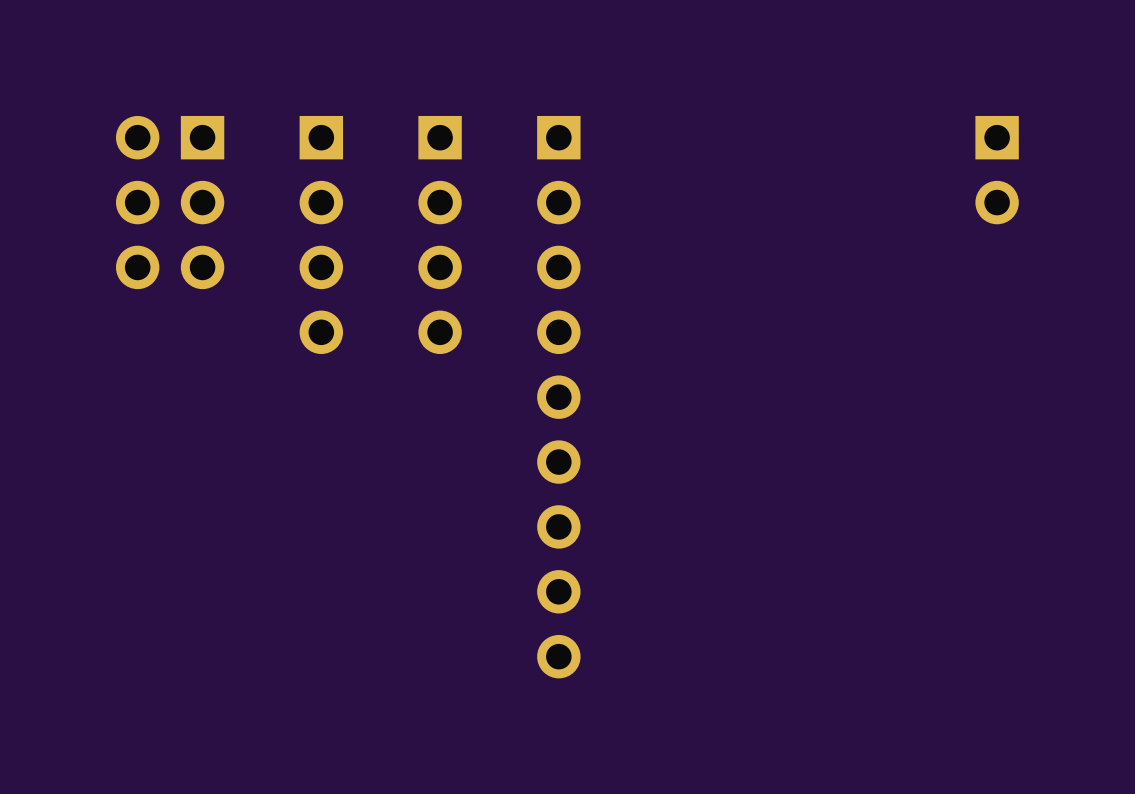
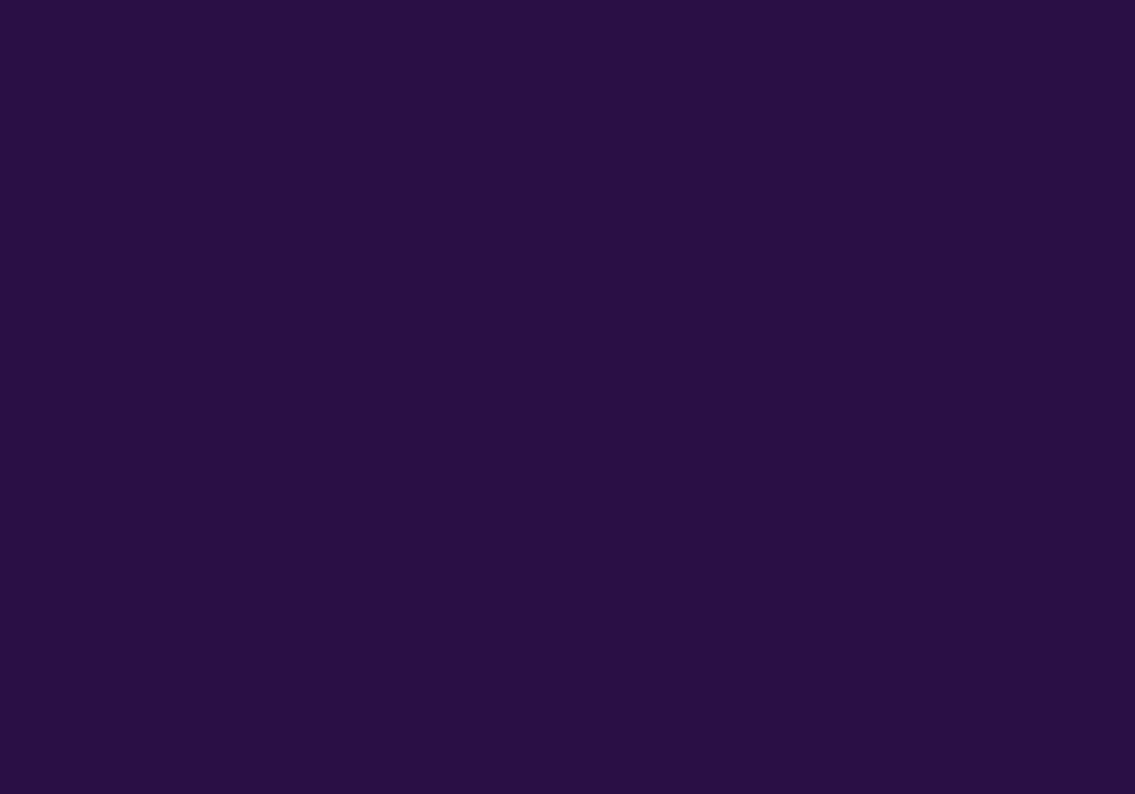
part: (997, 170) -> none
part: (170, 202) -> none
part: (321, 234) -> none
part: (440, 234) -> none
part: (558, 397) -> none

